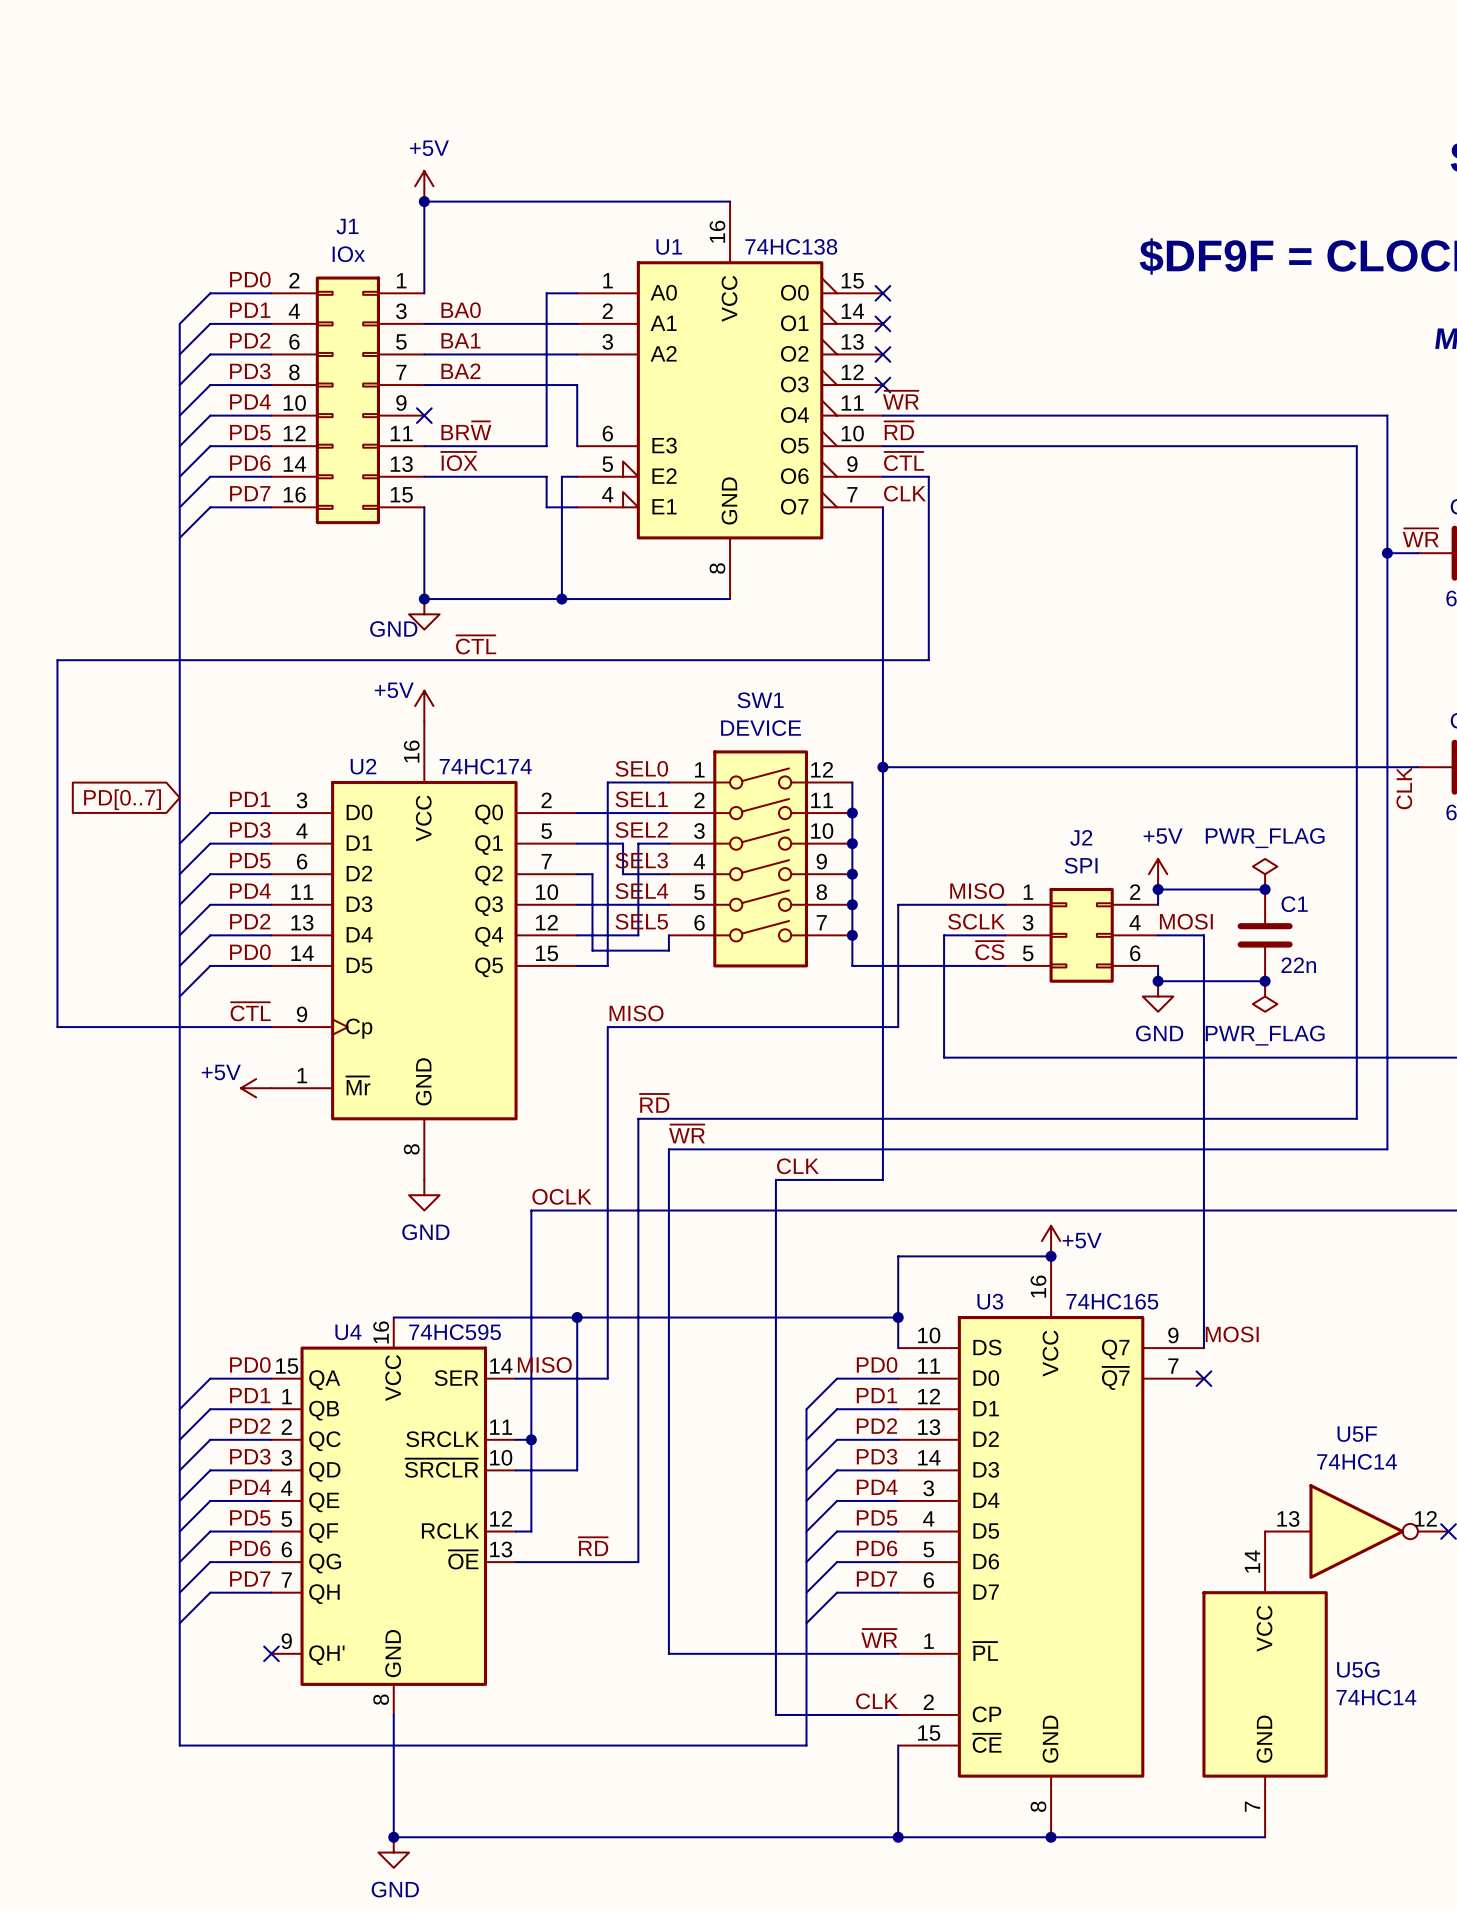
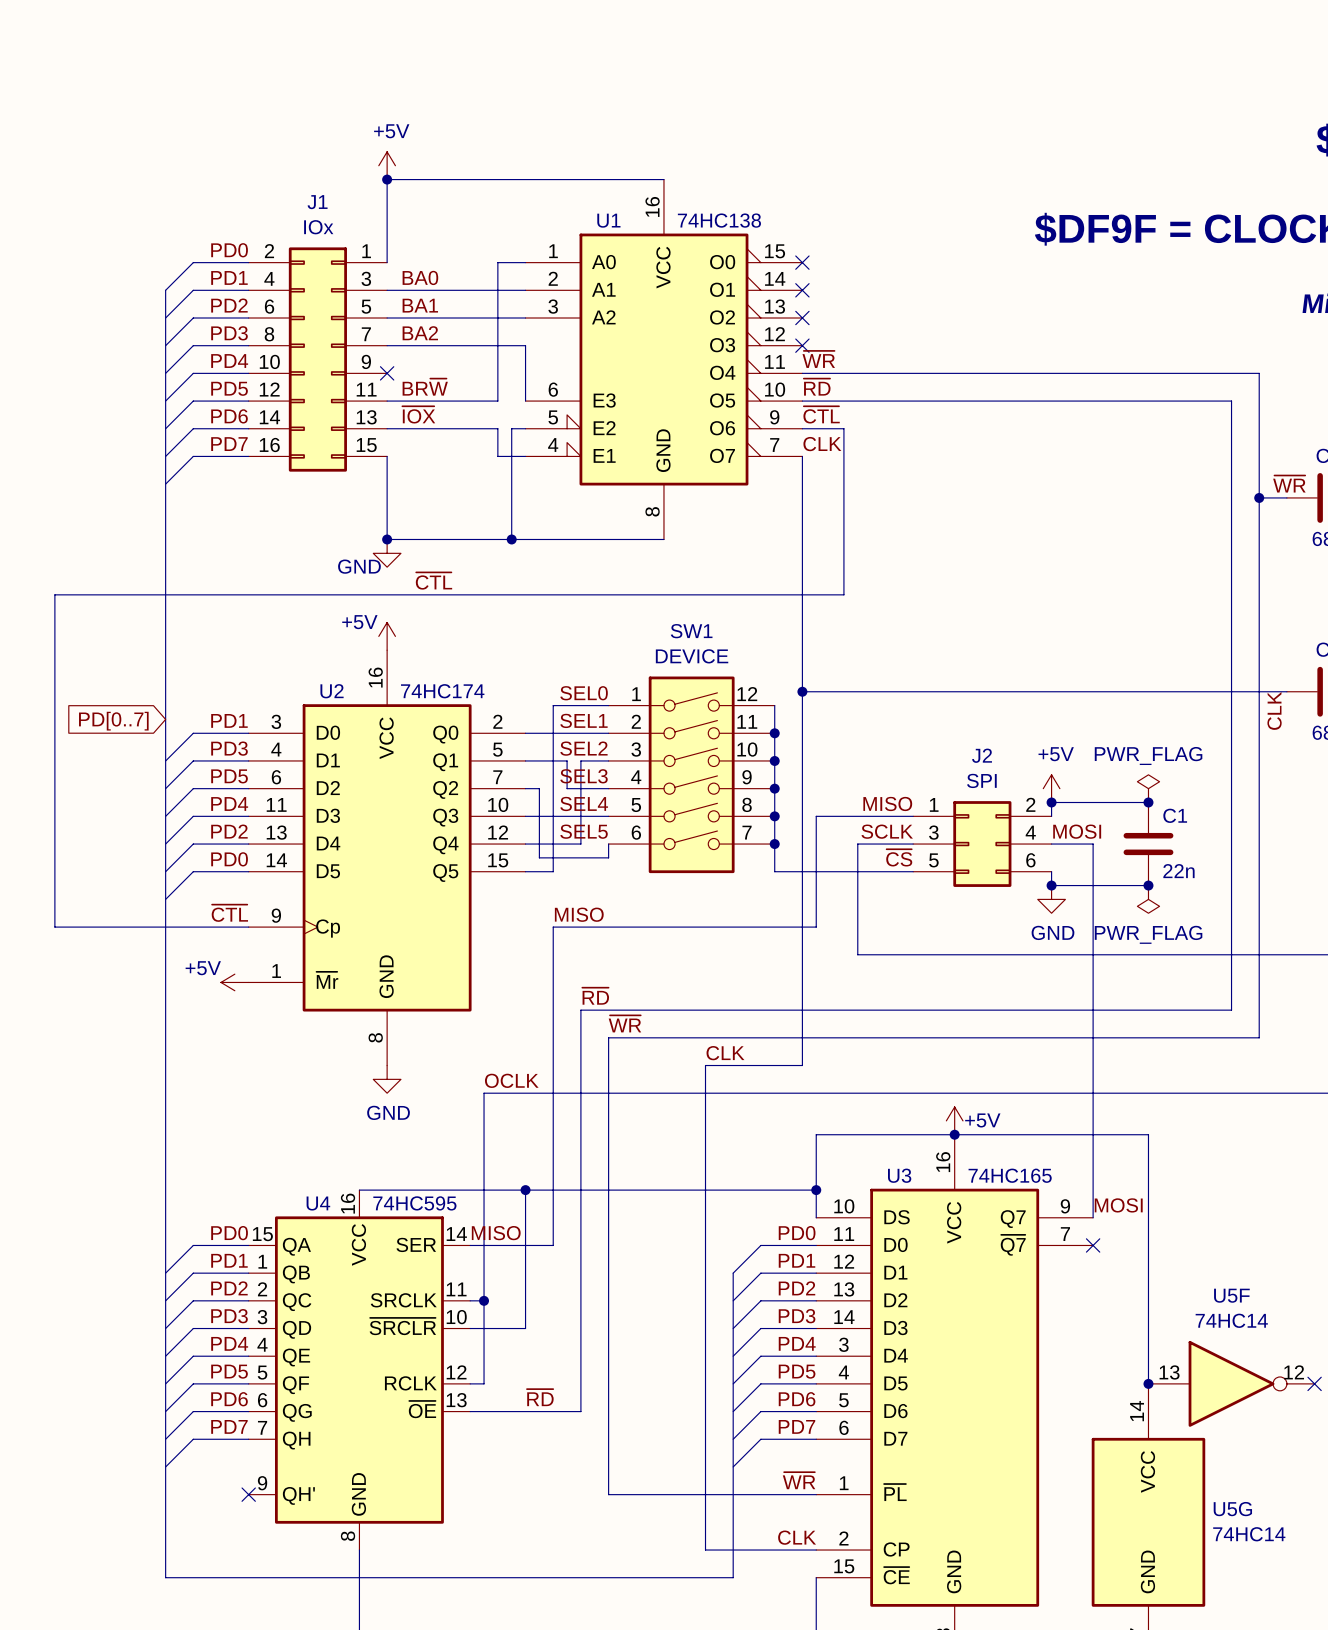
wire: none -> (954, 1134) (1148, 1134) (1148, 1383)
junction: none -> (1148, 1383)

